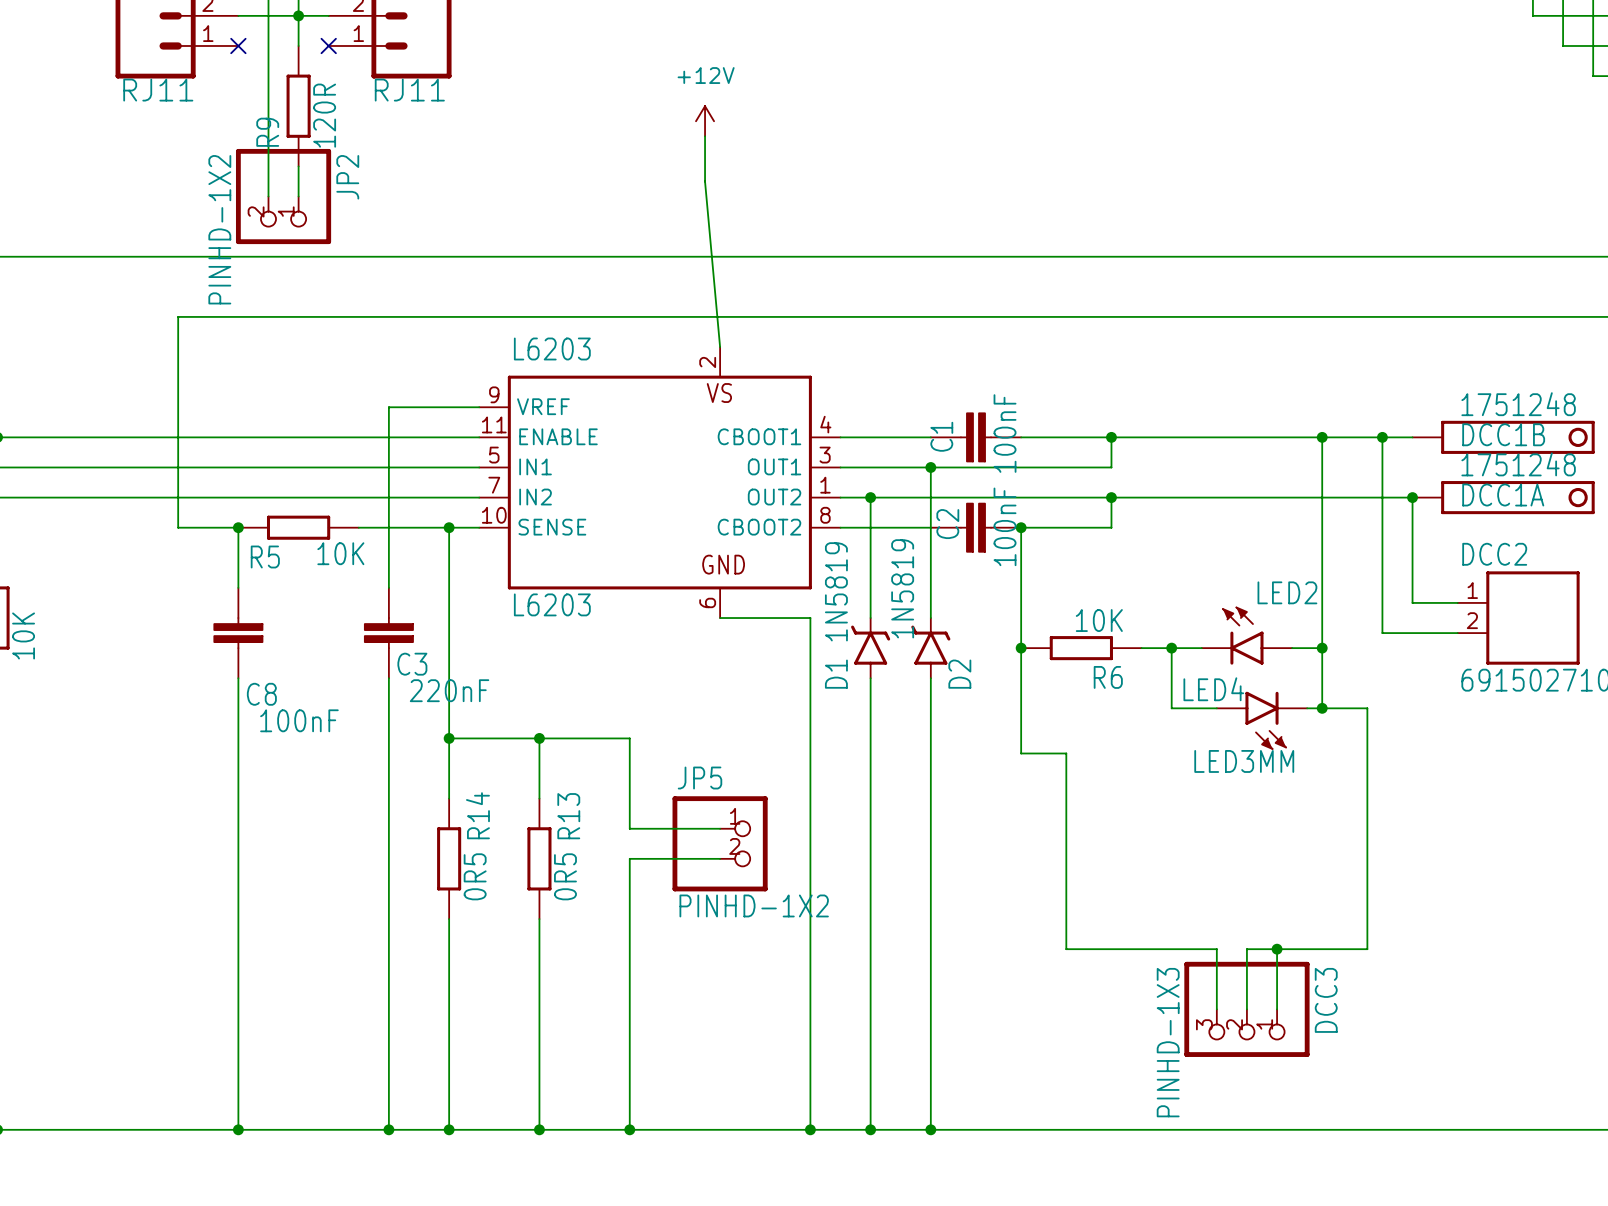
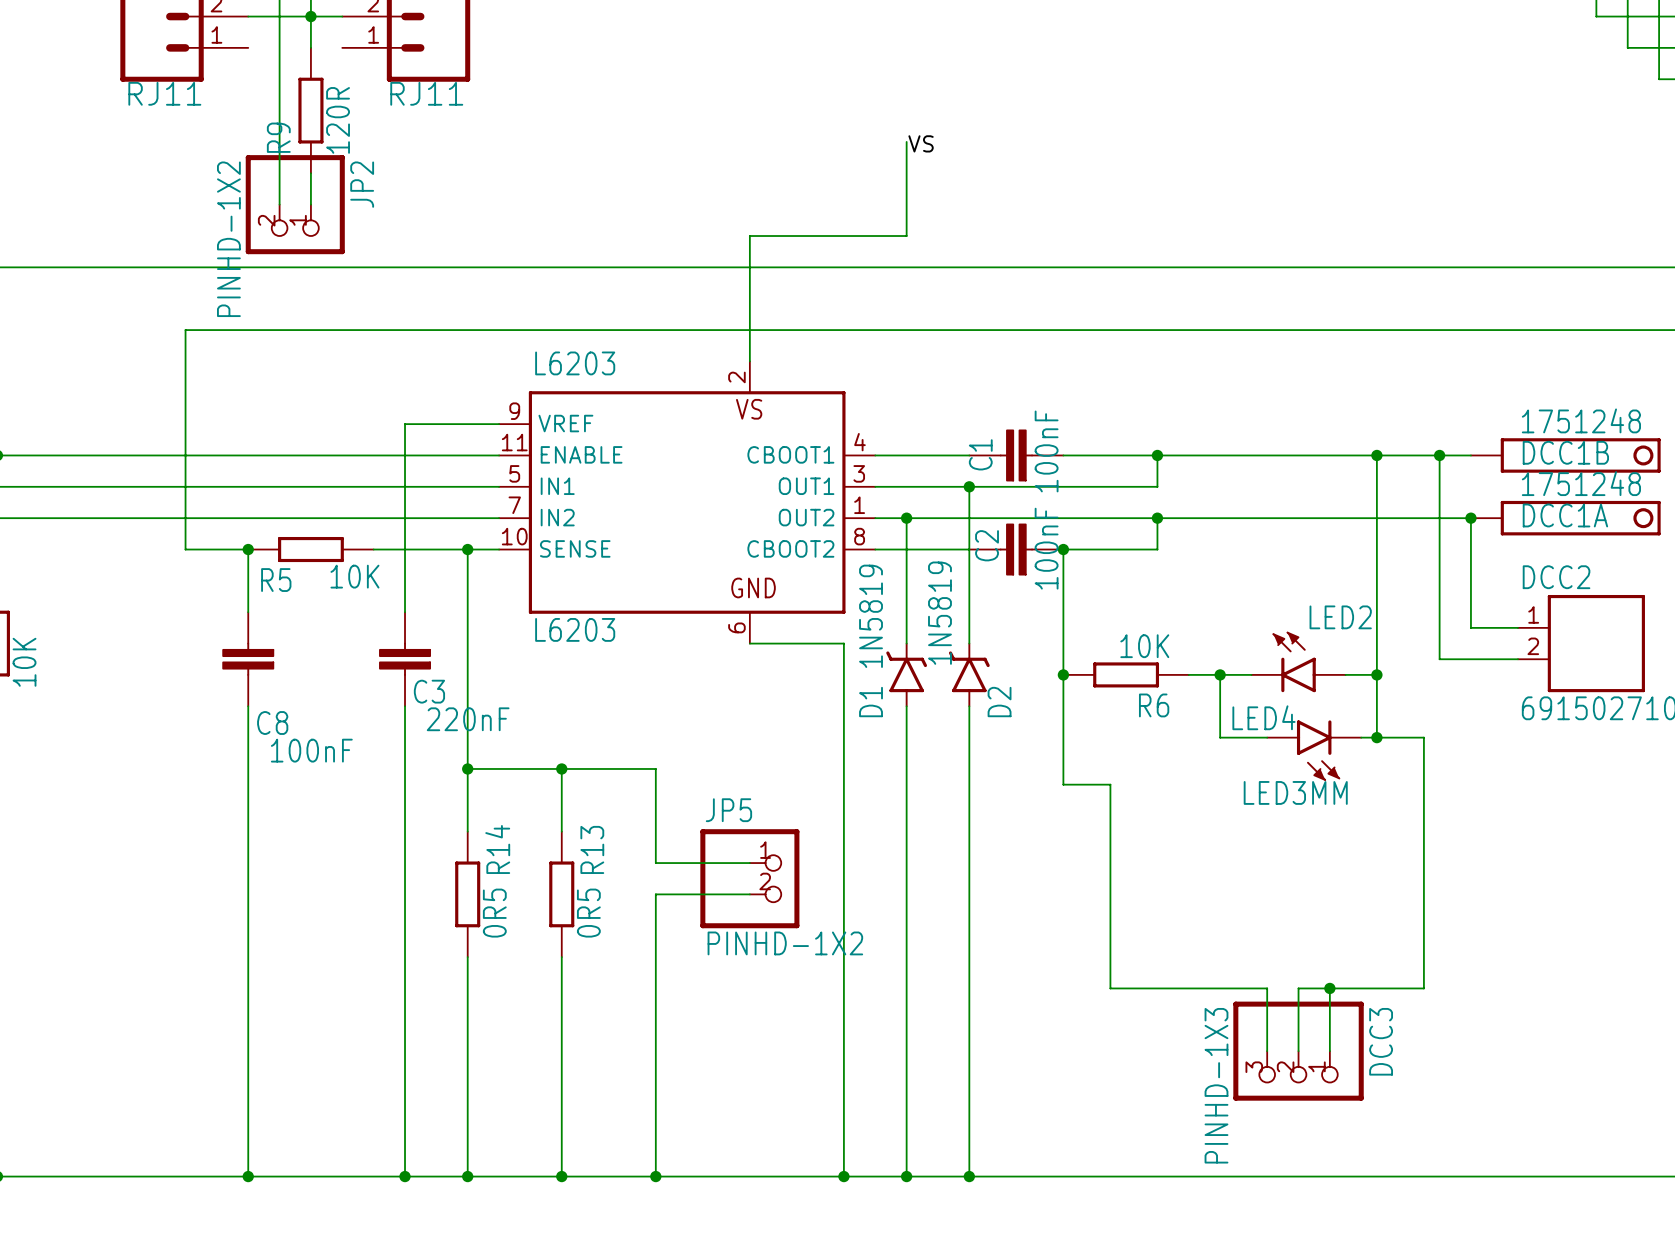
no-connect mark: (238, 45) -> none
no-connect mark: (328, 45) -> none
power symbol: +12V (705, 121) -> none
wire: (705, 136) (705, 181) (720, 347) -> (906, 141) (906, 236) (749, 236) (749, 361)
label: none -> VS (921, 143)

